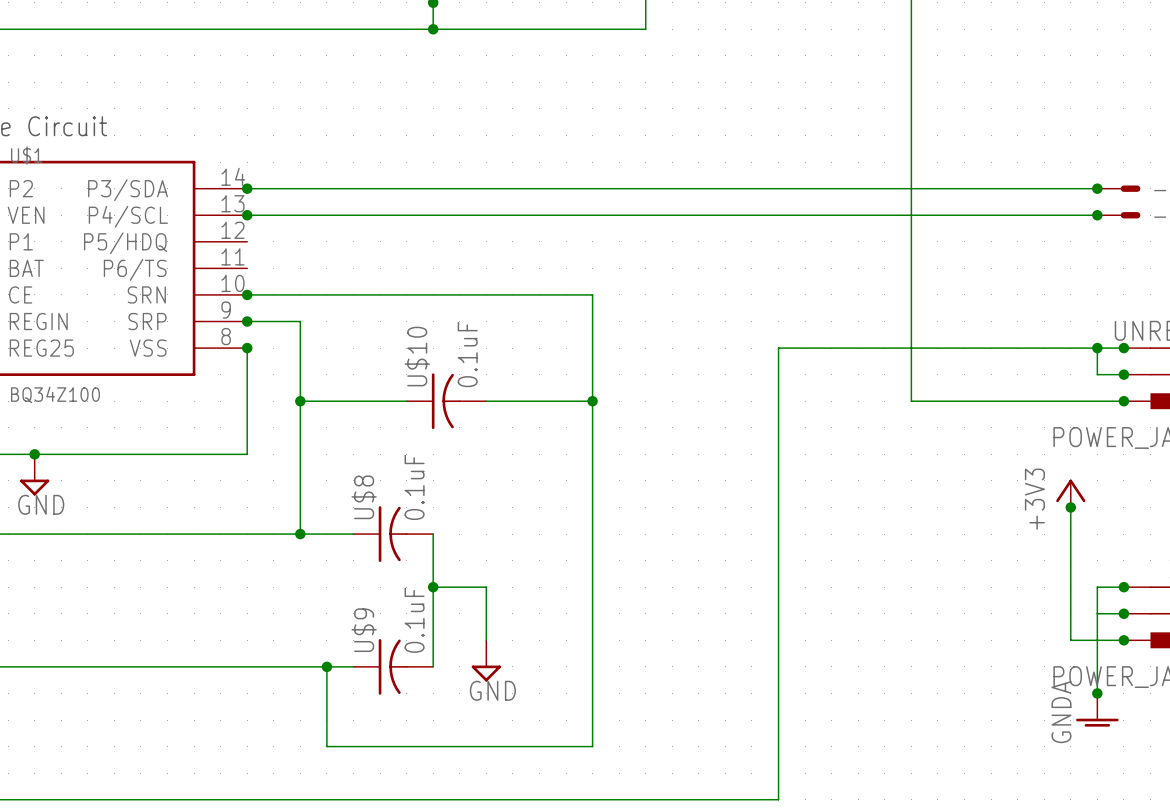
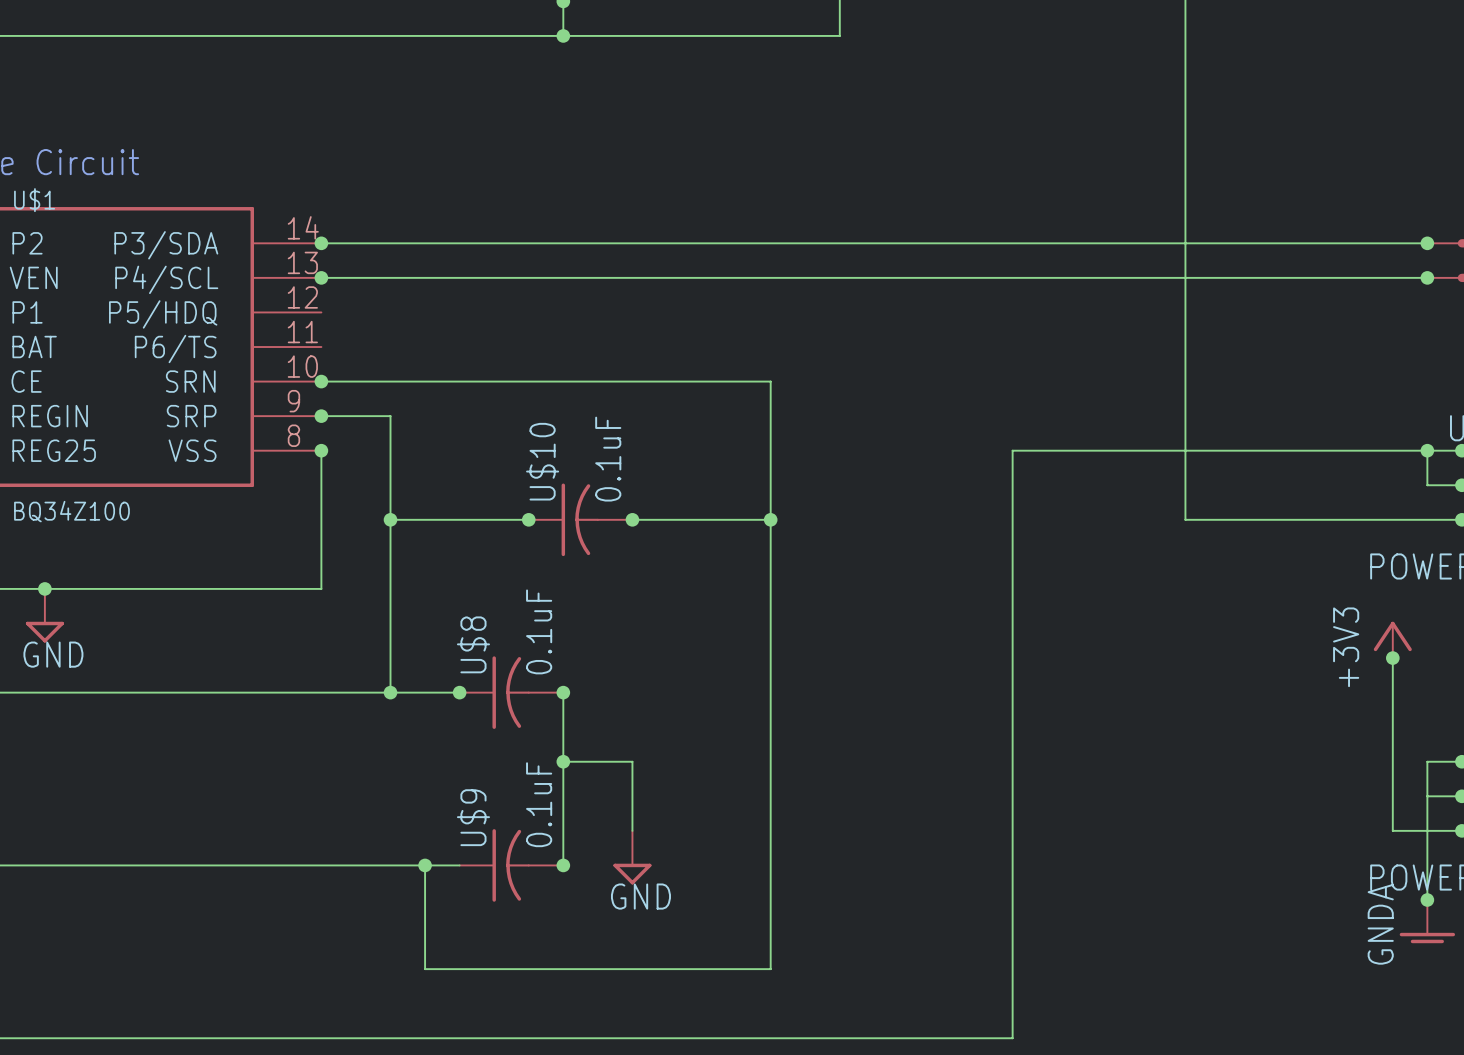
junction: none -> (528, 519)
junction: none -> (632, 519)
junction: none -> (459, 692)
junction: none -> (563, 692)
junction: none -> (563, 865)

